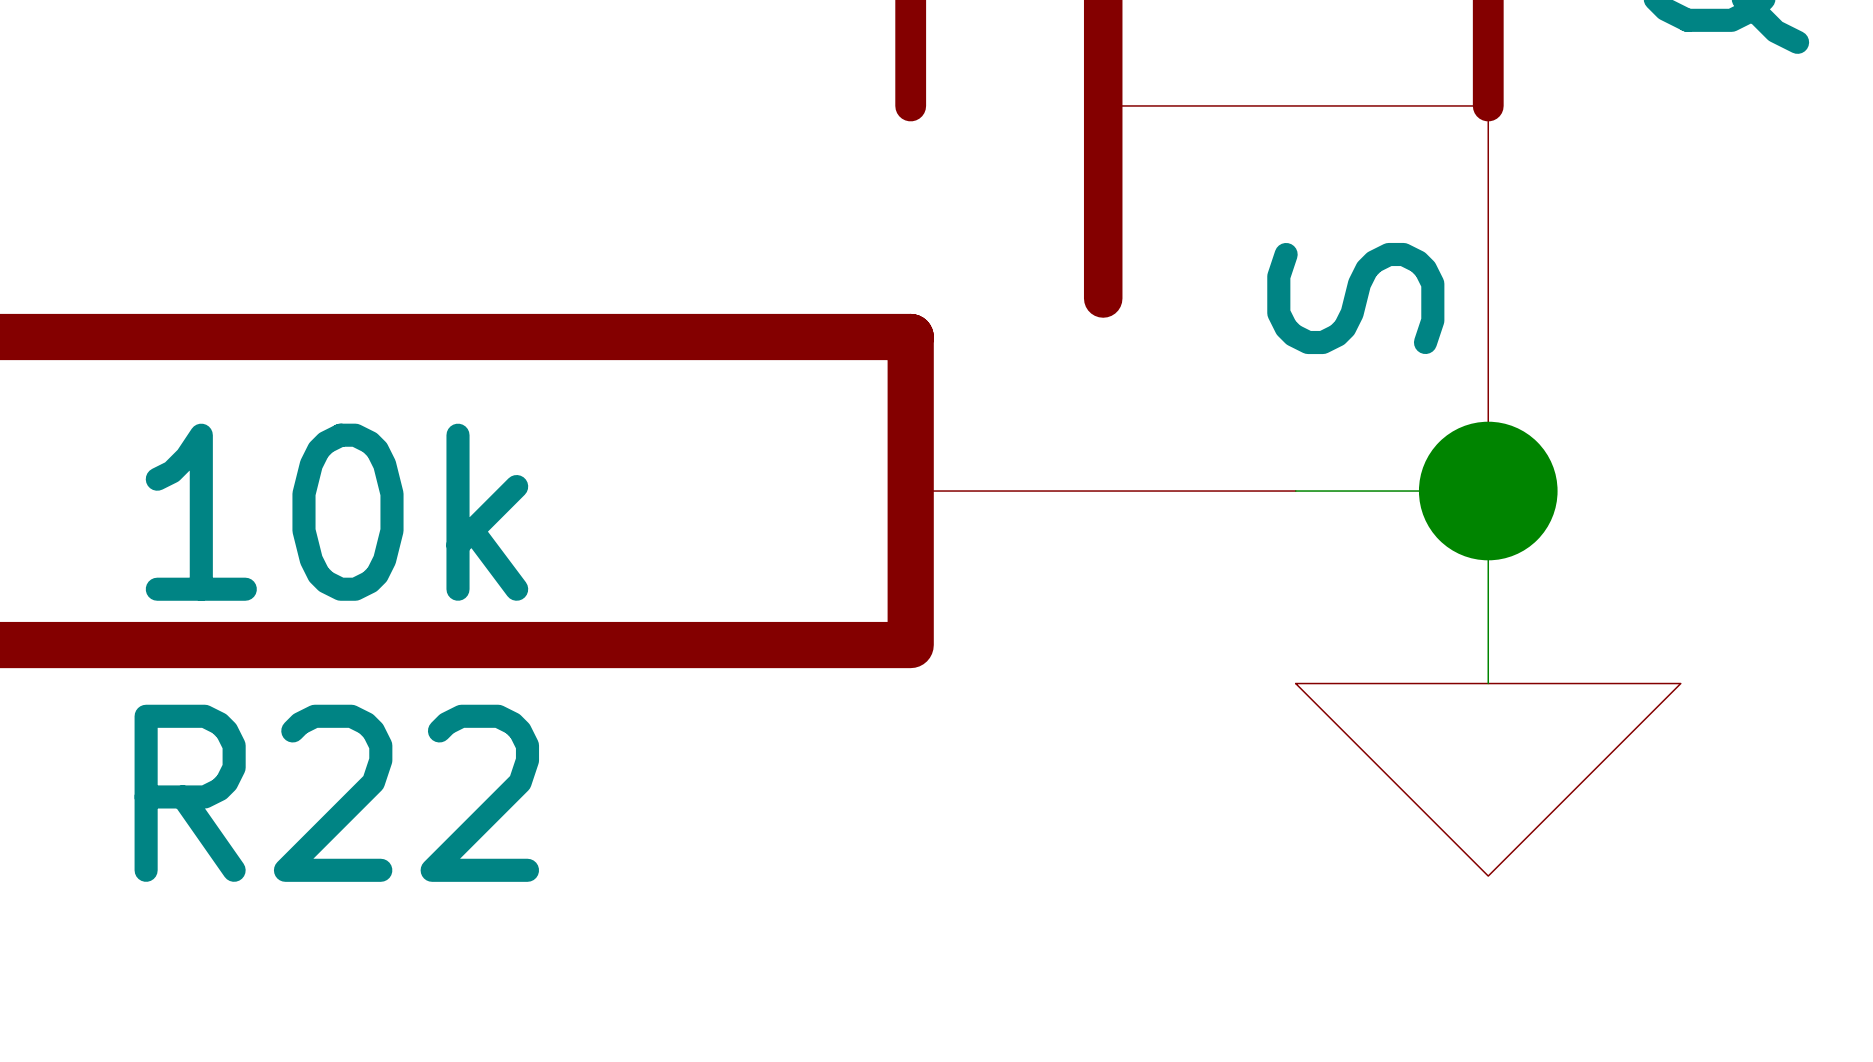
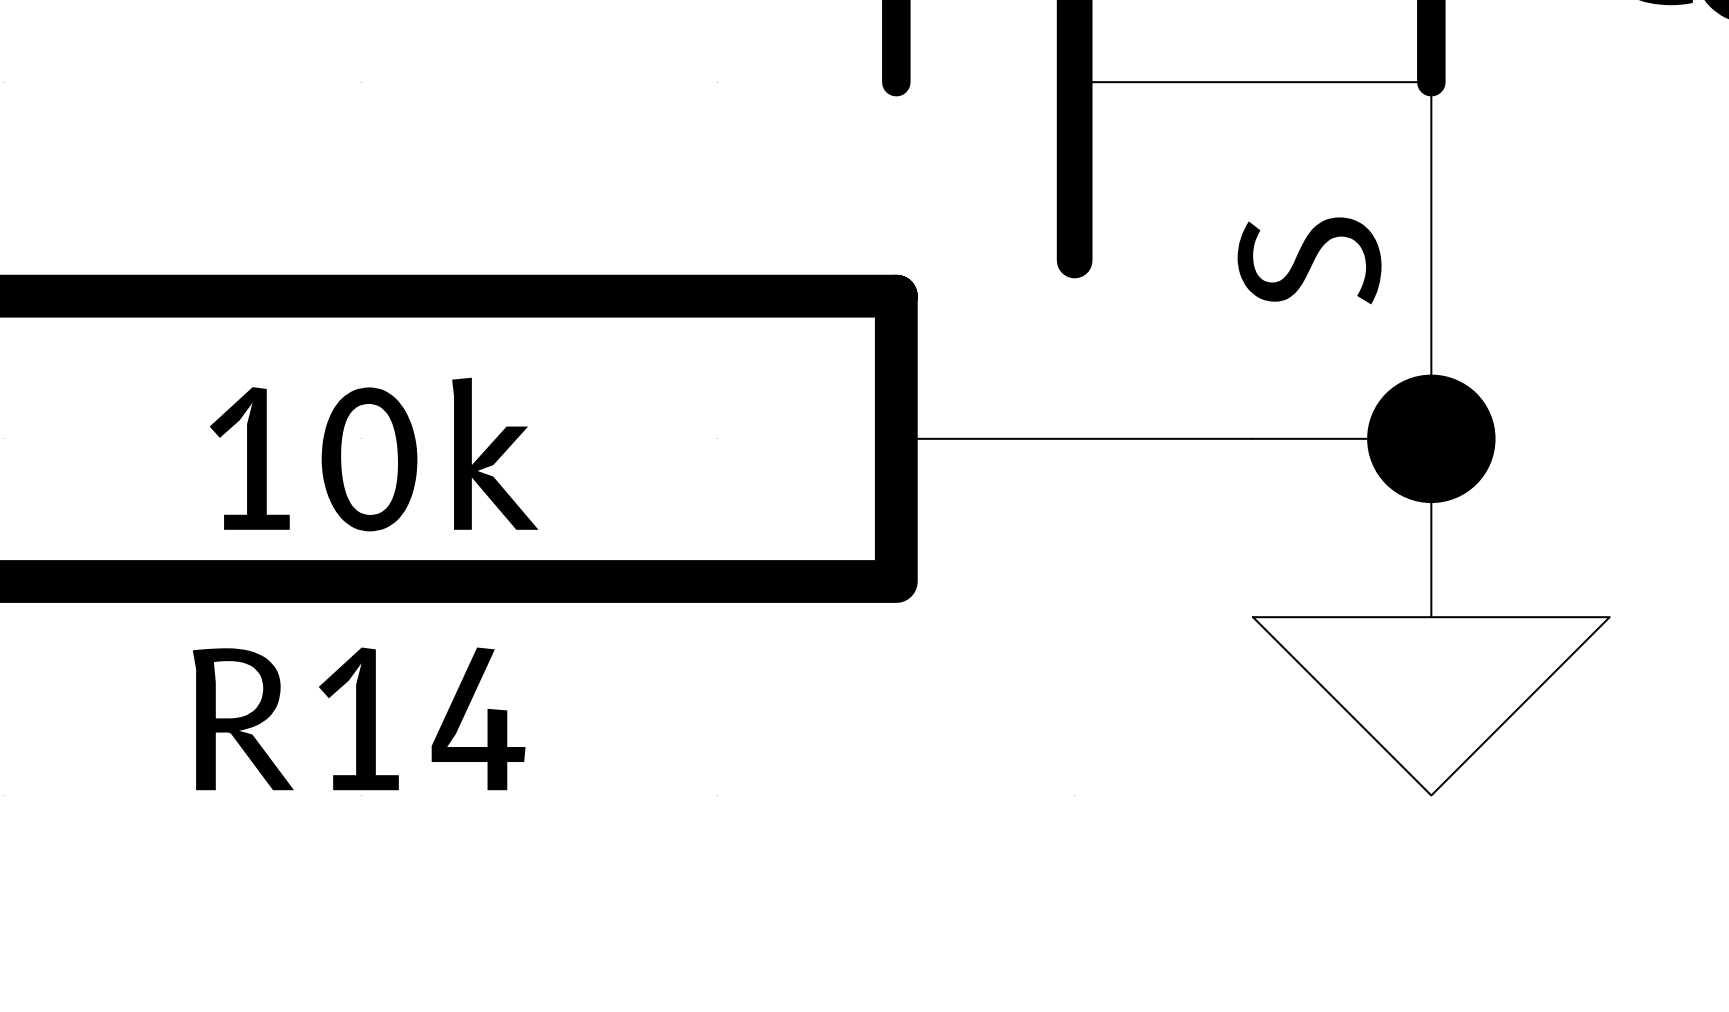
R22 name: R22 (336, 793) -> R14 (359, 718)

